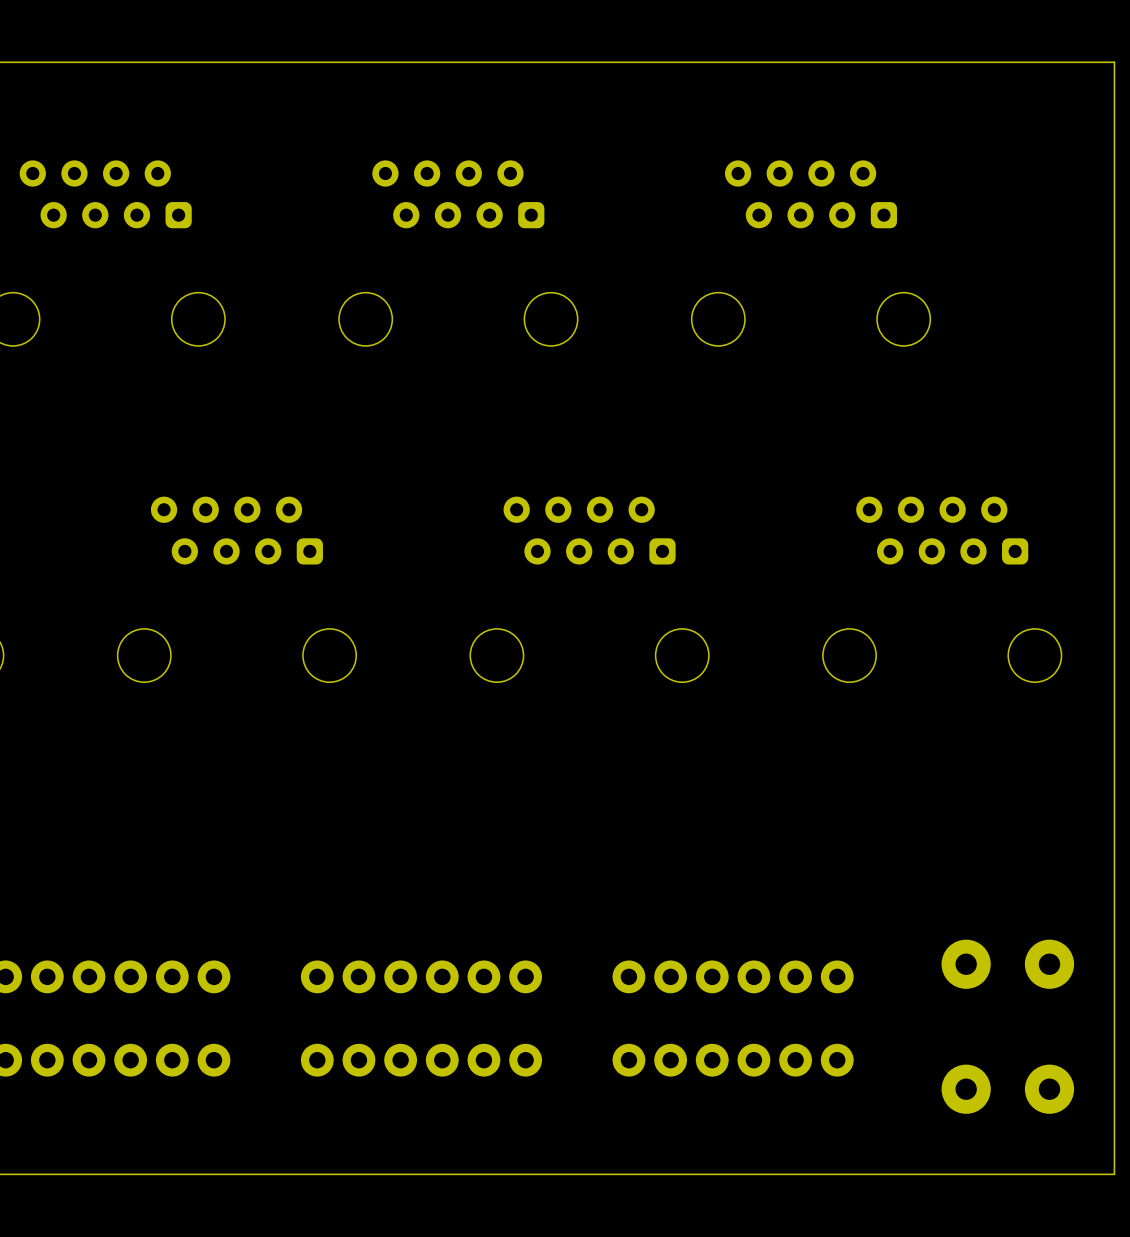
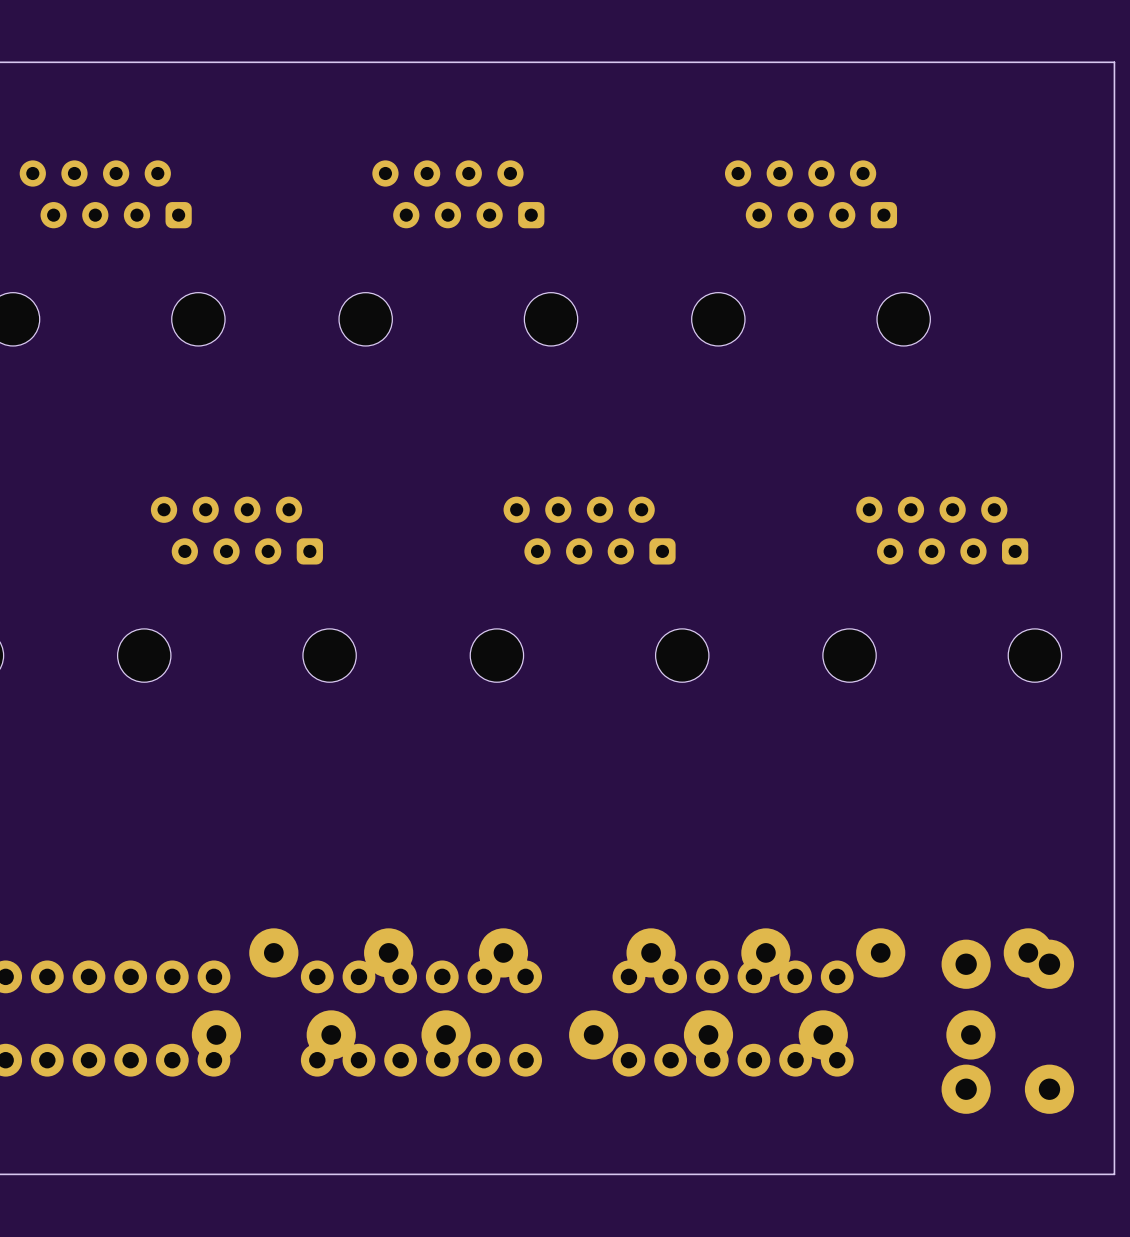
part: none -> (359, 993)
part: none -> (737, 993)
part: none -> (999, 993)

